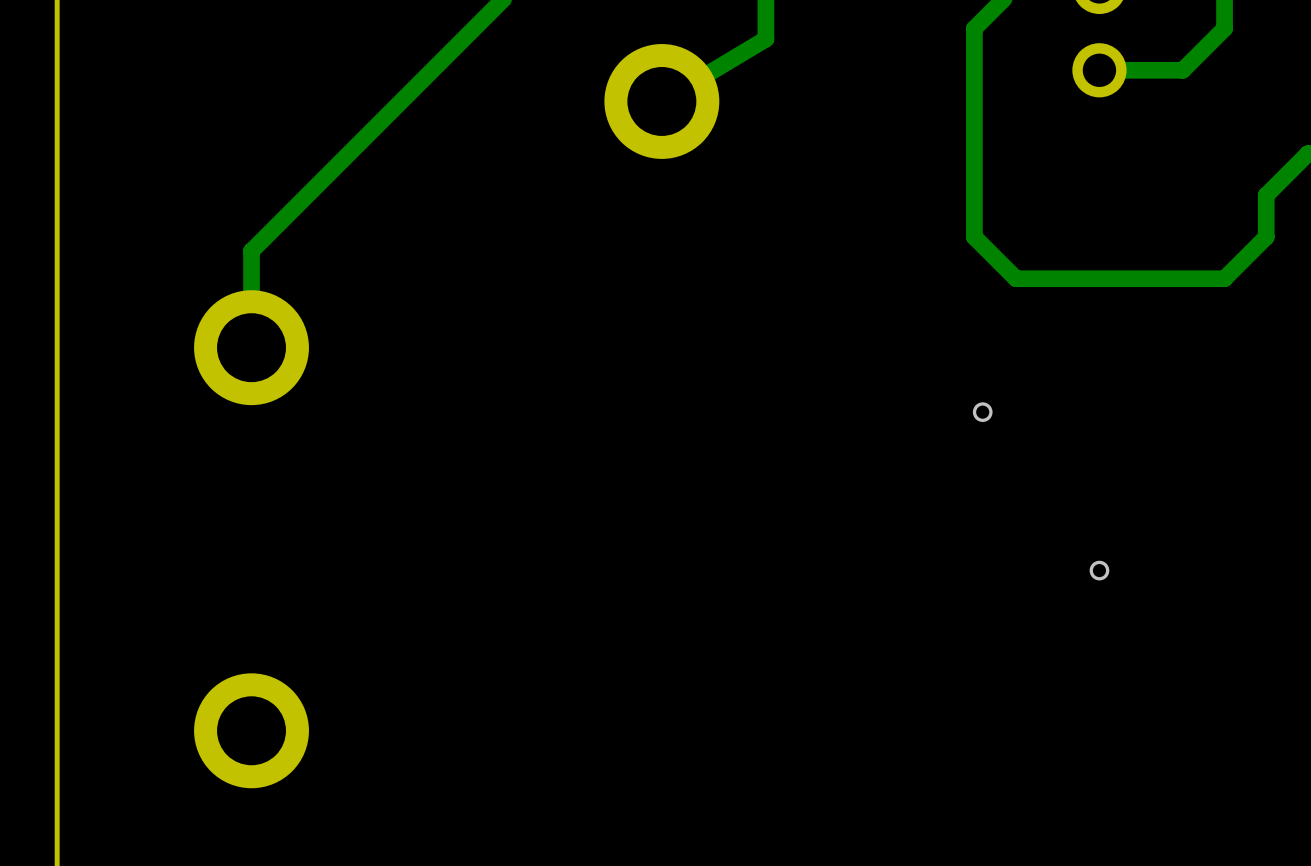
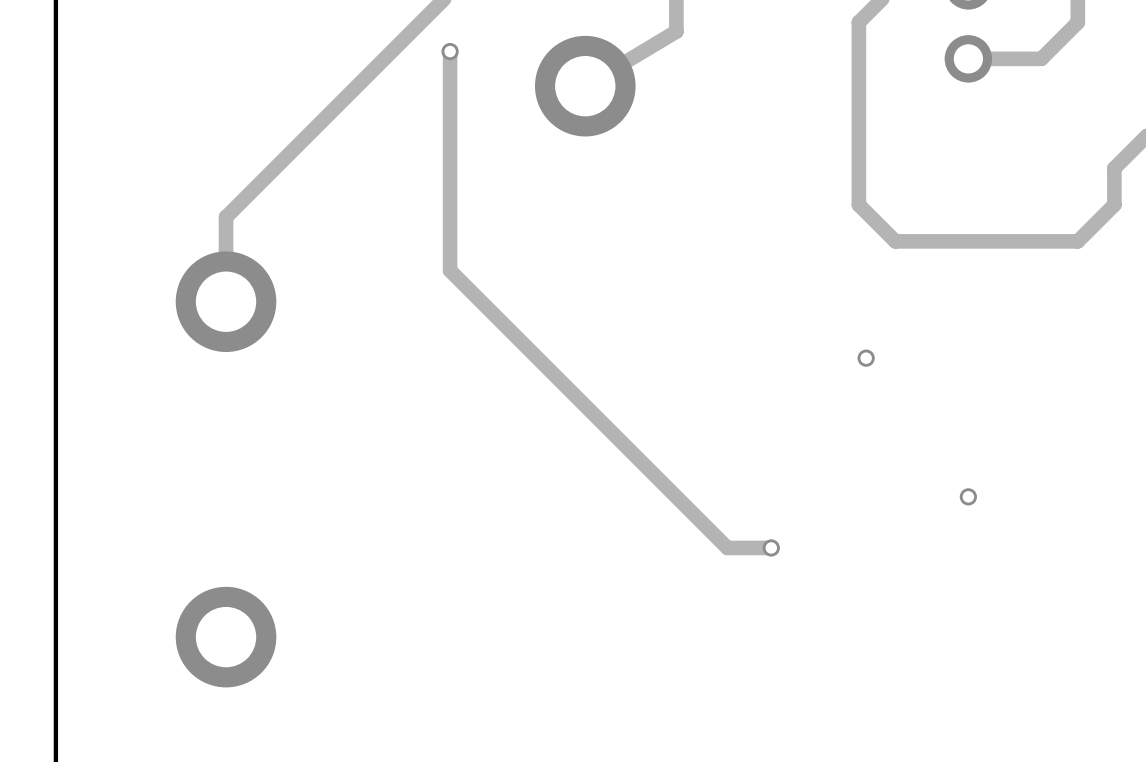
track: none -> (450, 51) (450, 270) (727, 547) (771, 547)
via: none -> (450, 51)
via: none -> (771, 547)

